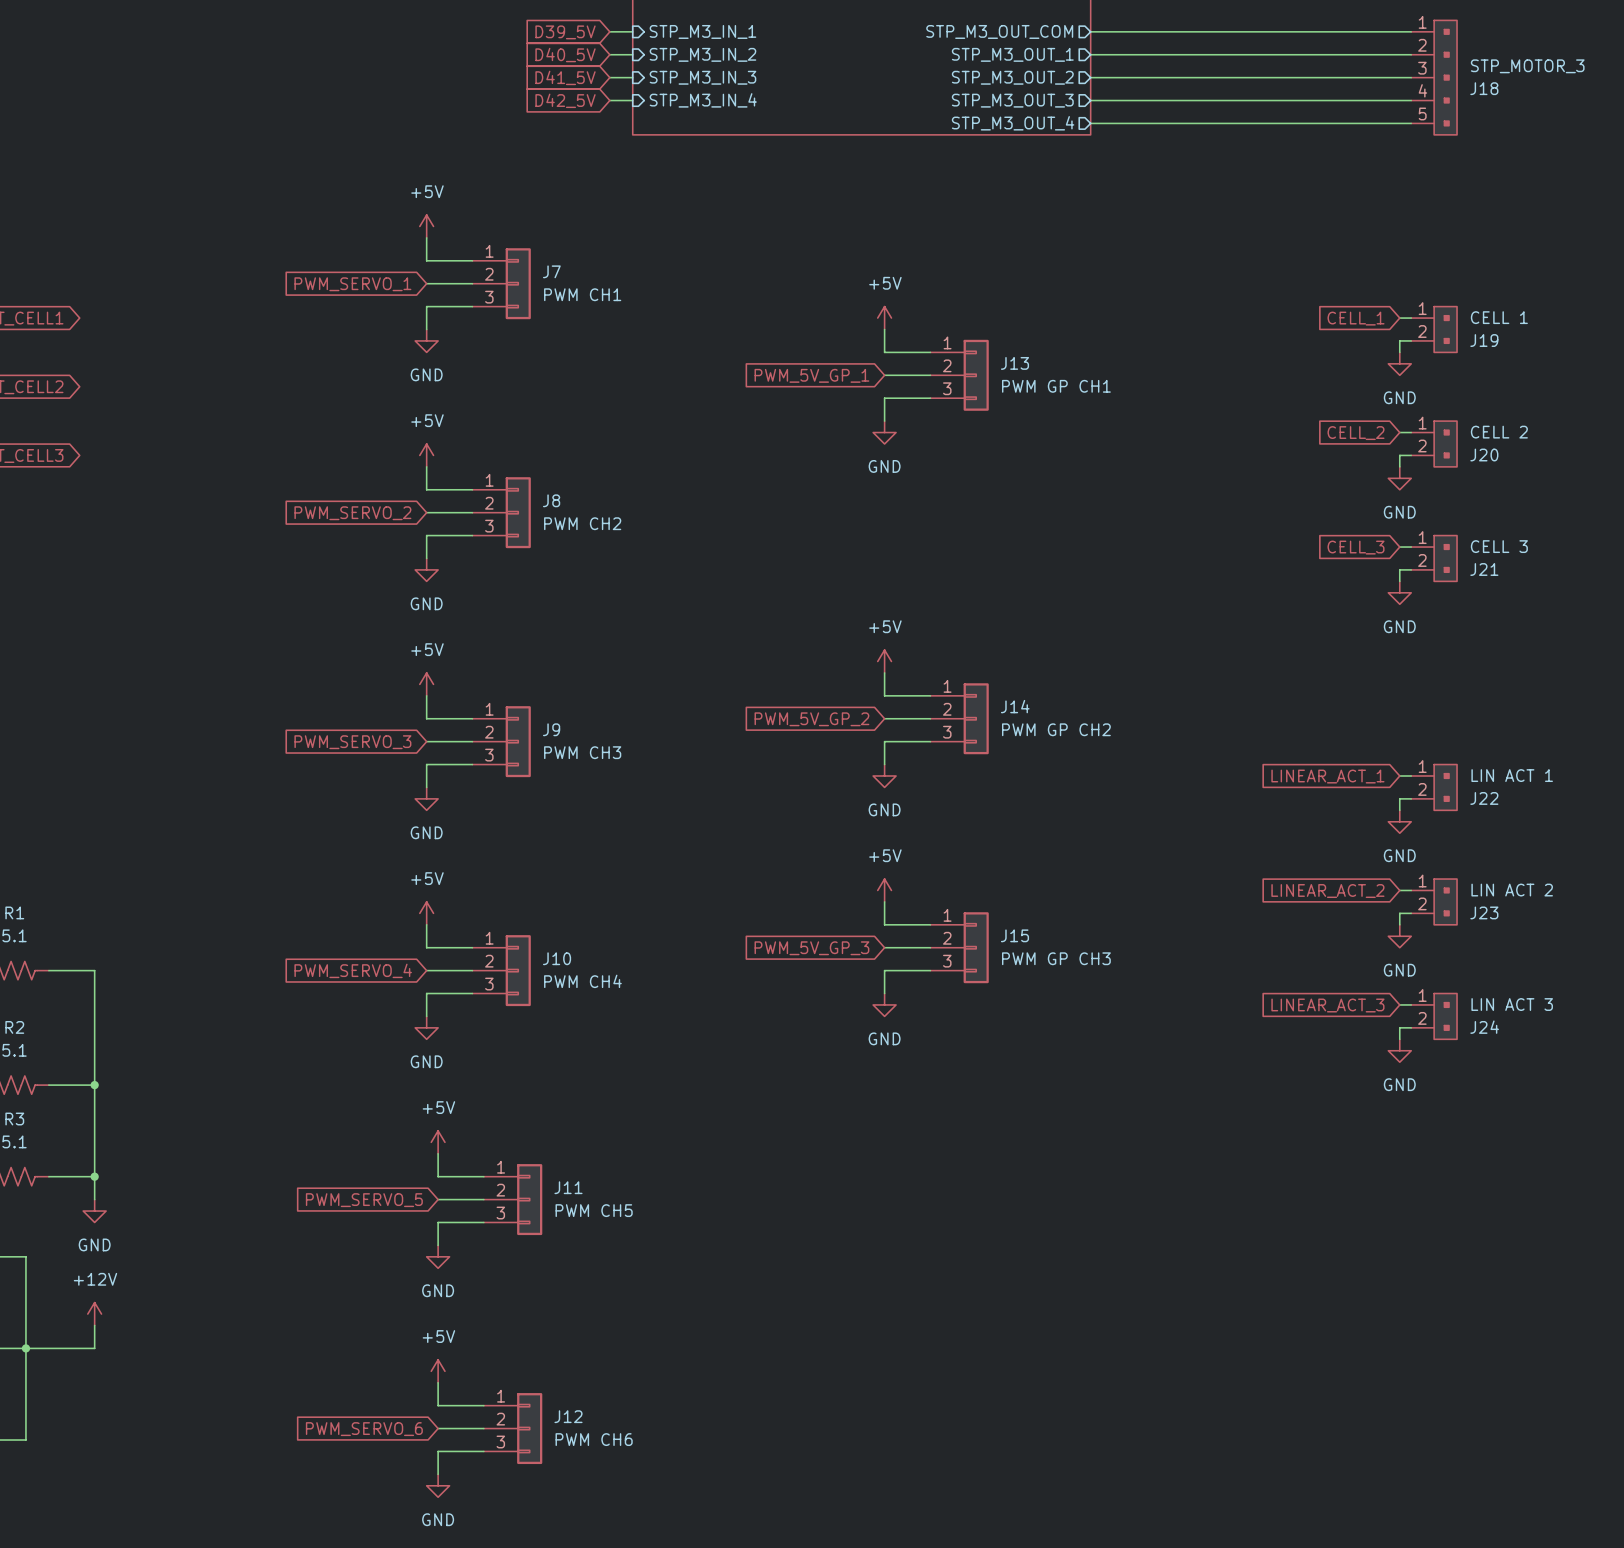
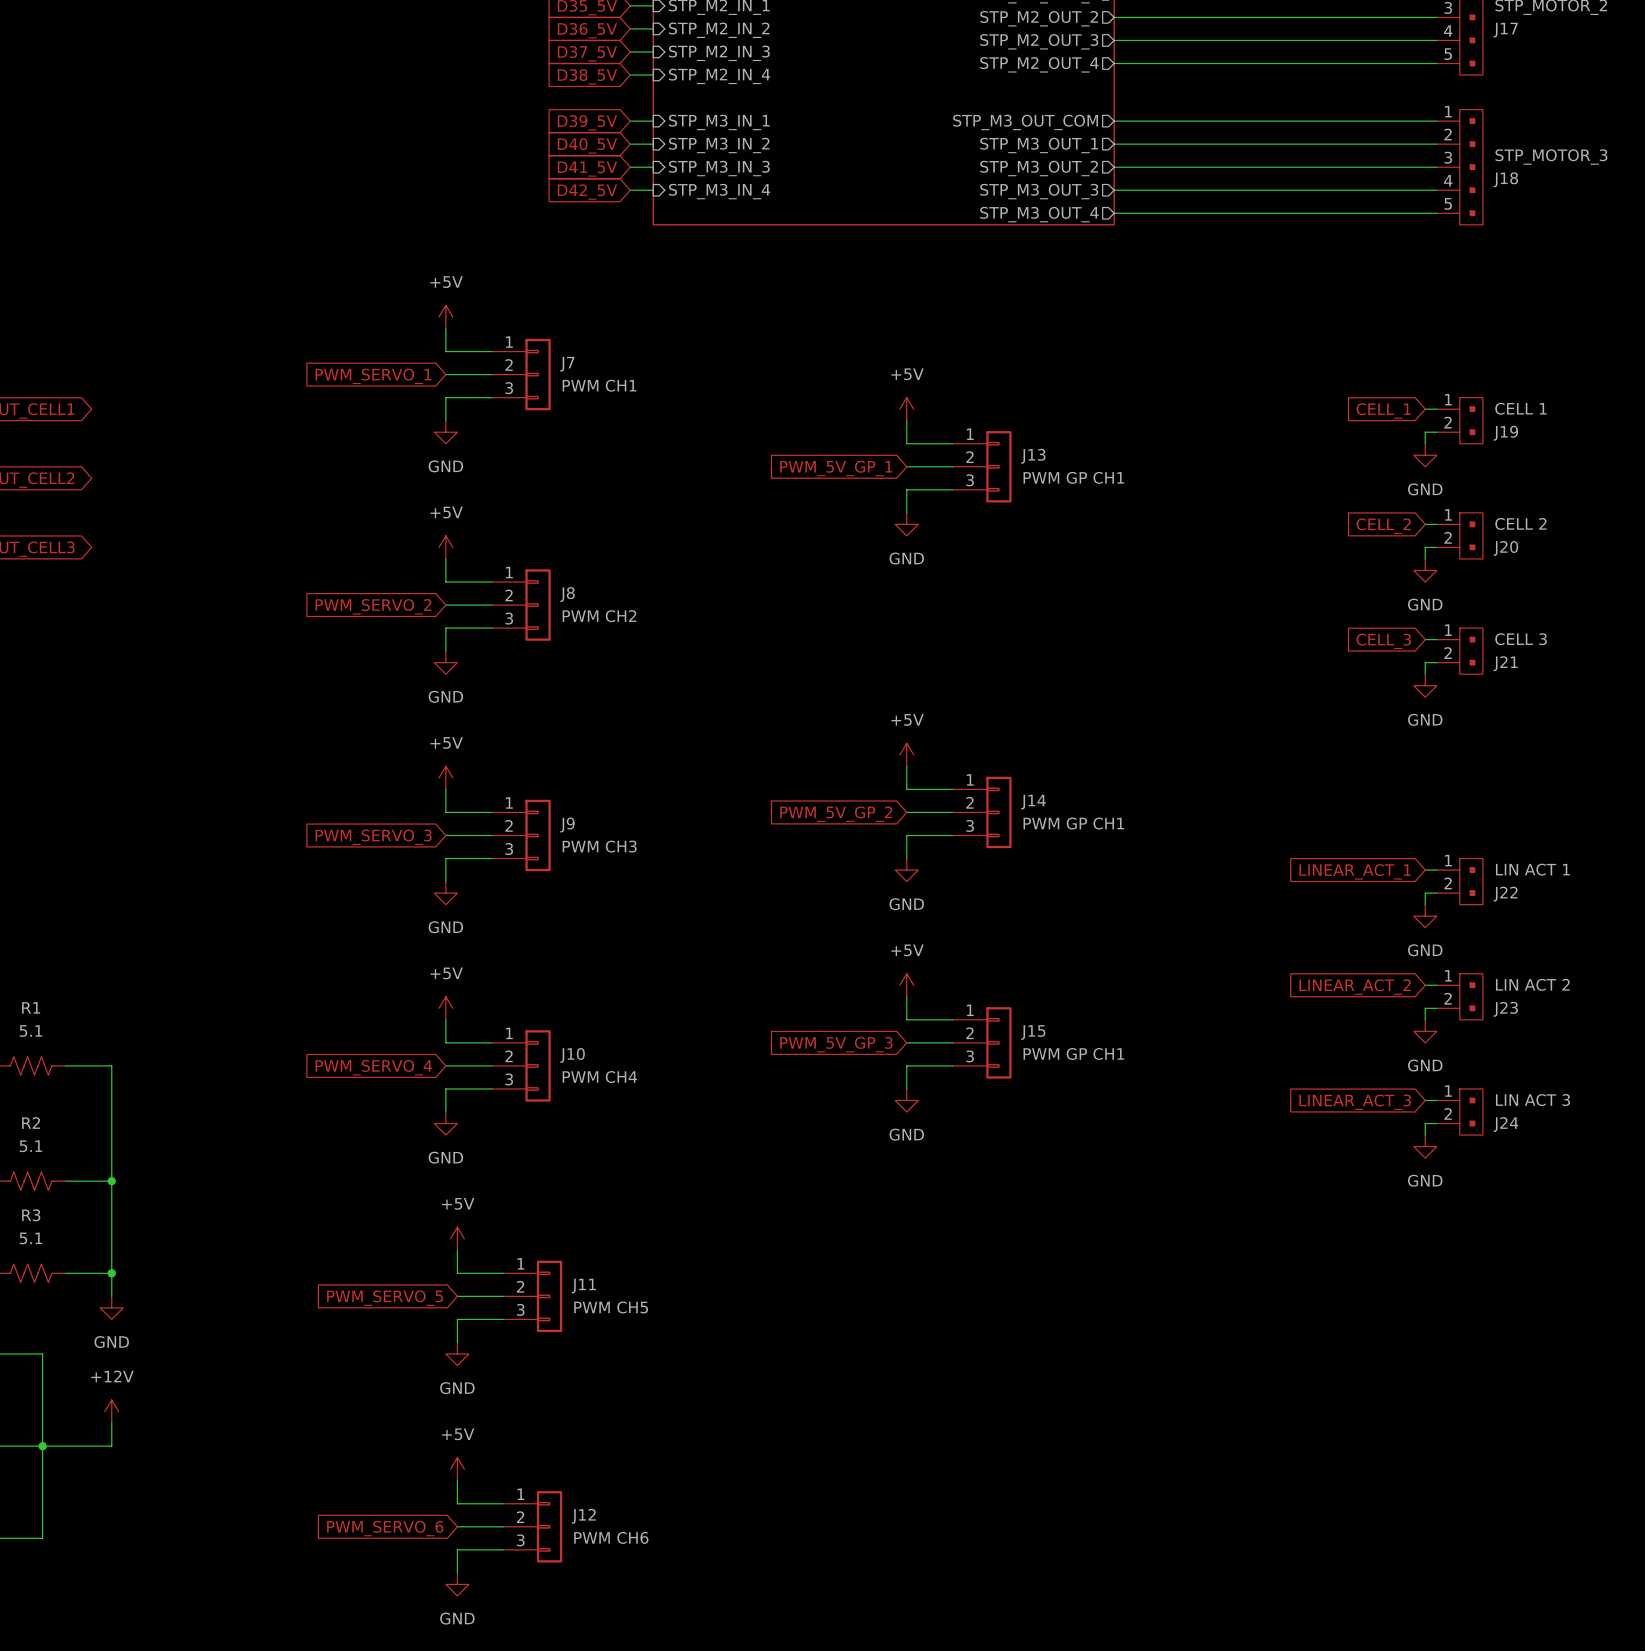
J14 value: PWM GP CH2 (1056, 729) -> PWM GP CH1 (1073, 823)
J15 value: PWM GP CH3 (1056, 958) -> PWM GP CH1 (1073, 1053)

